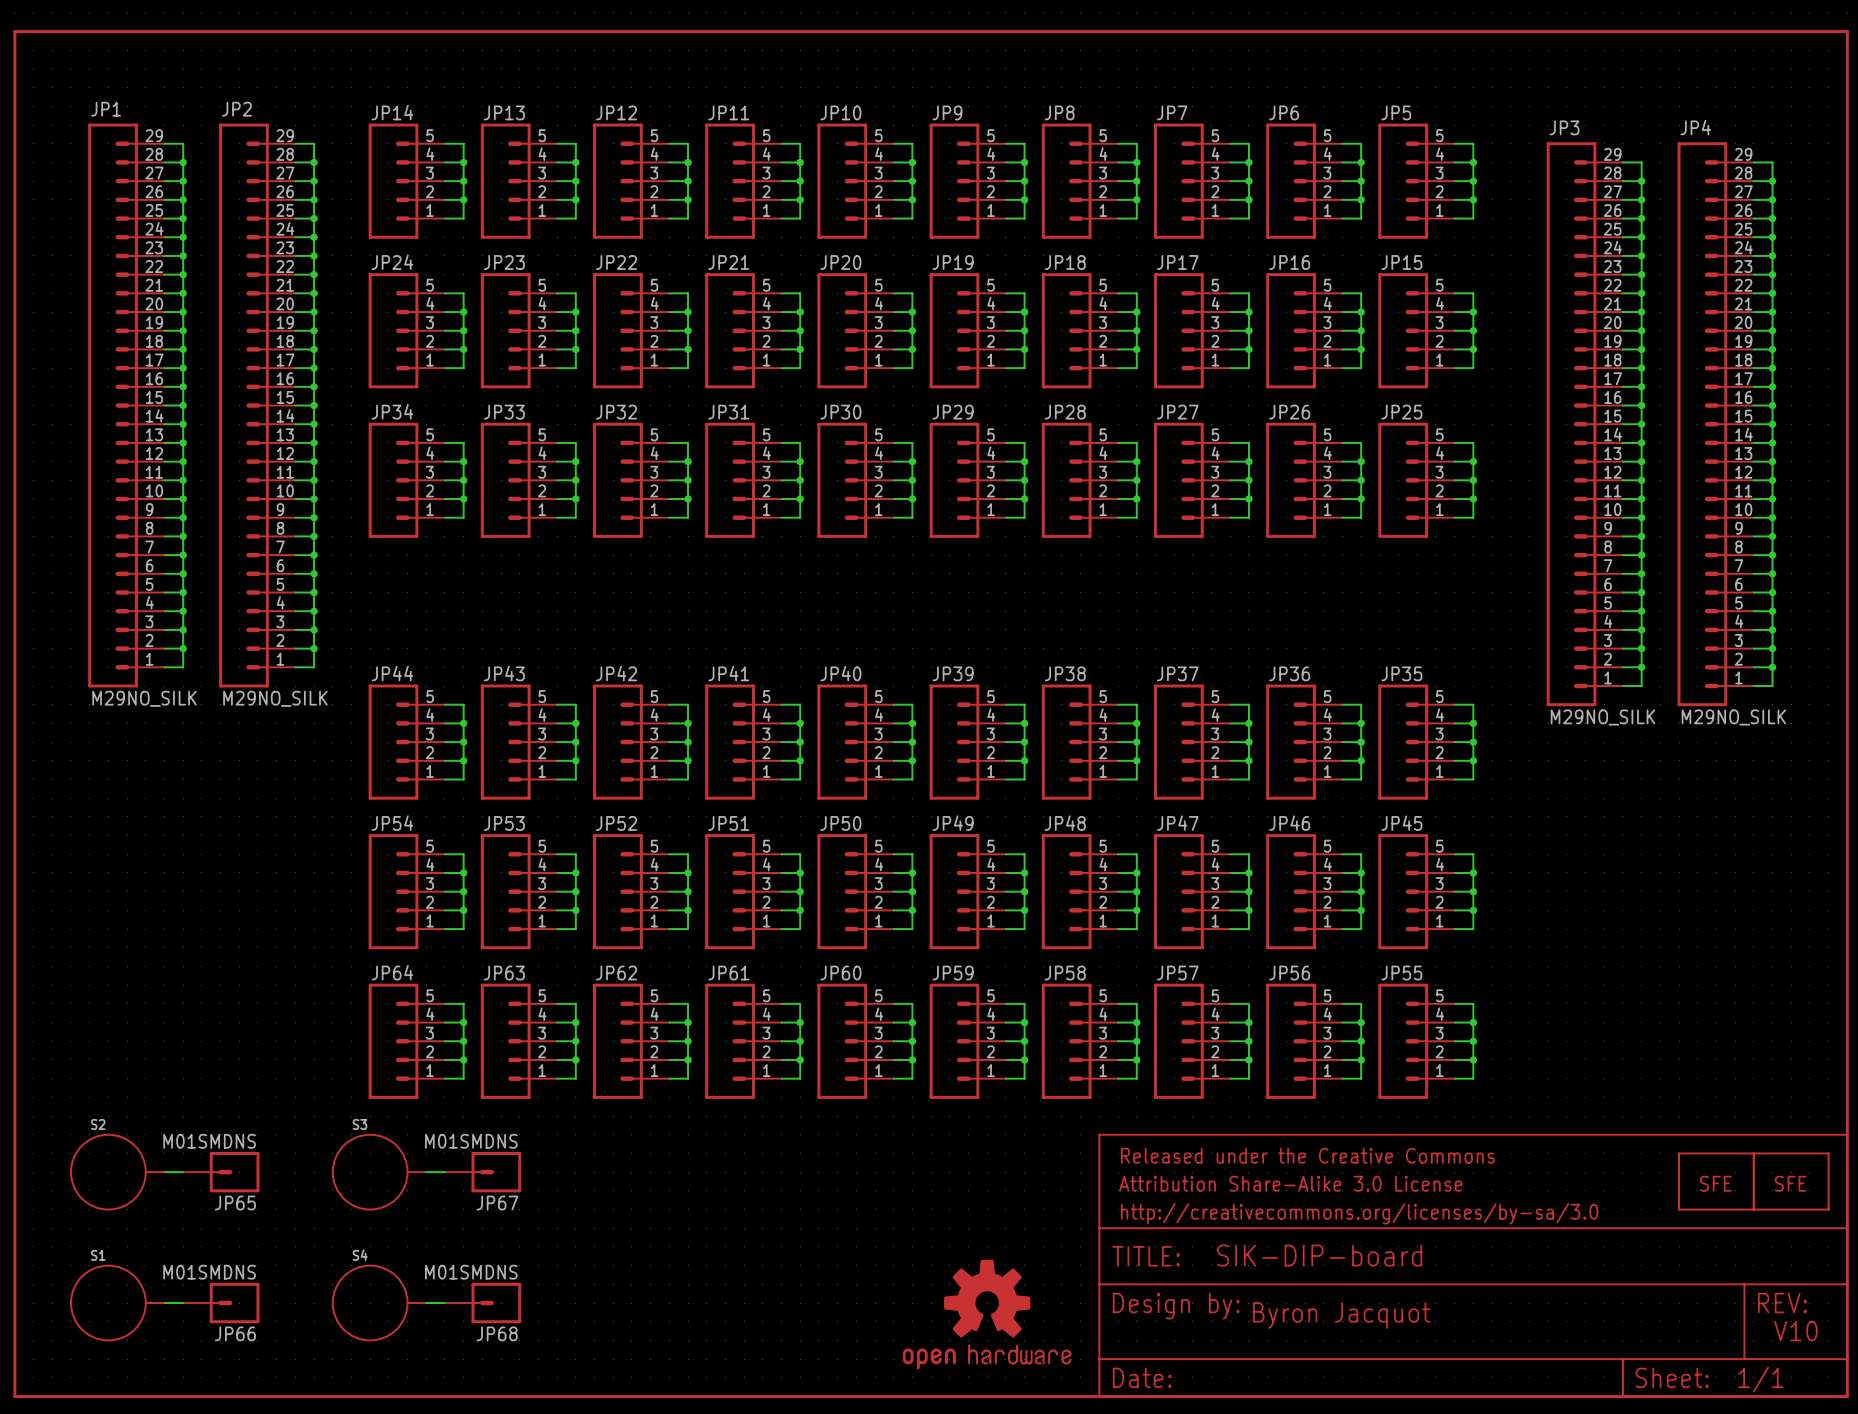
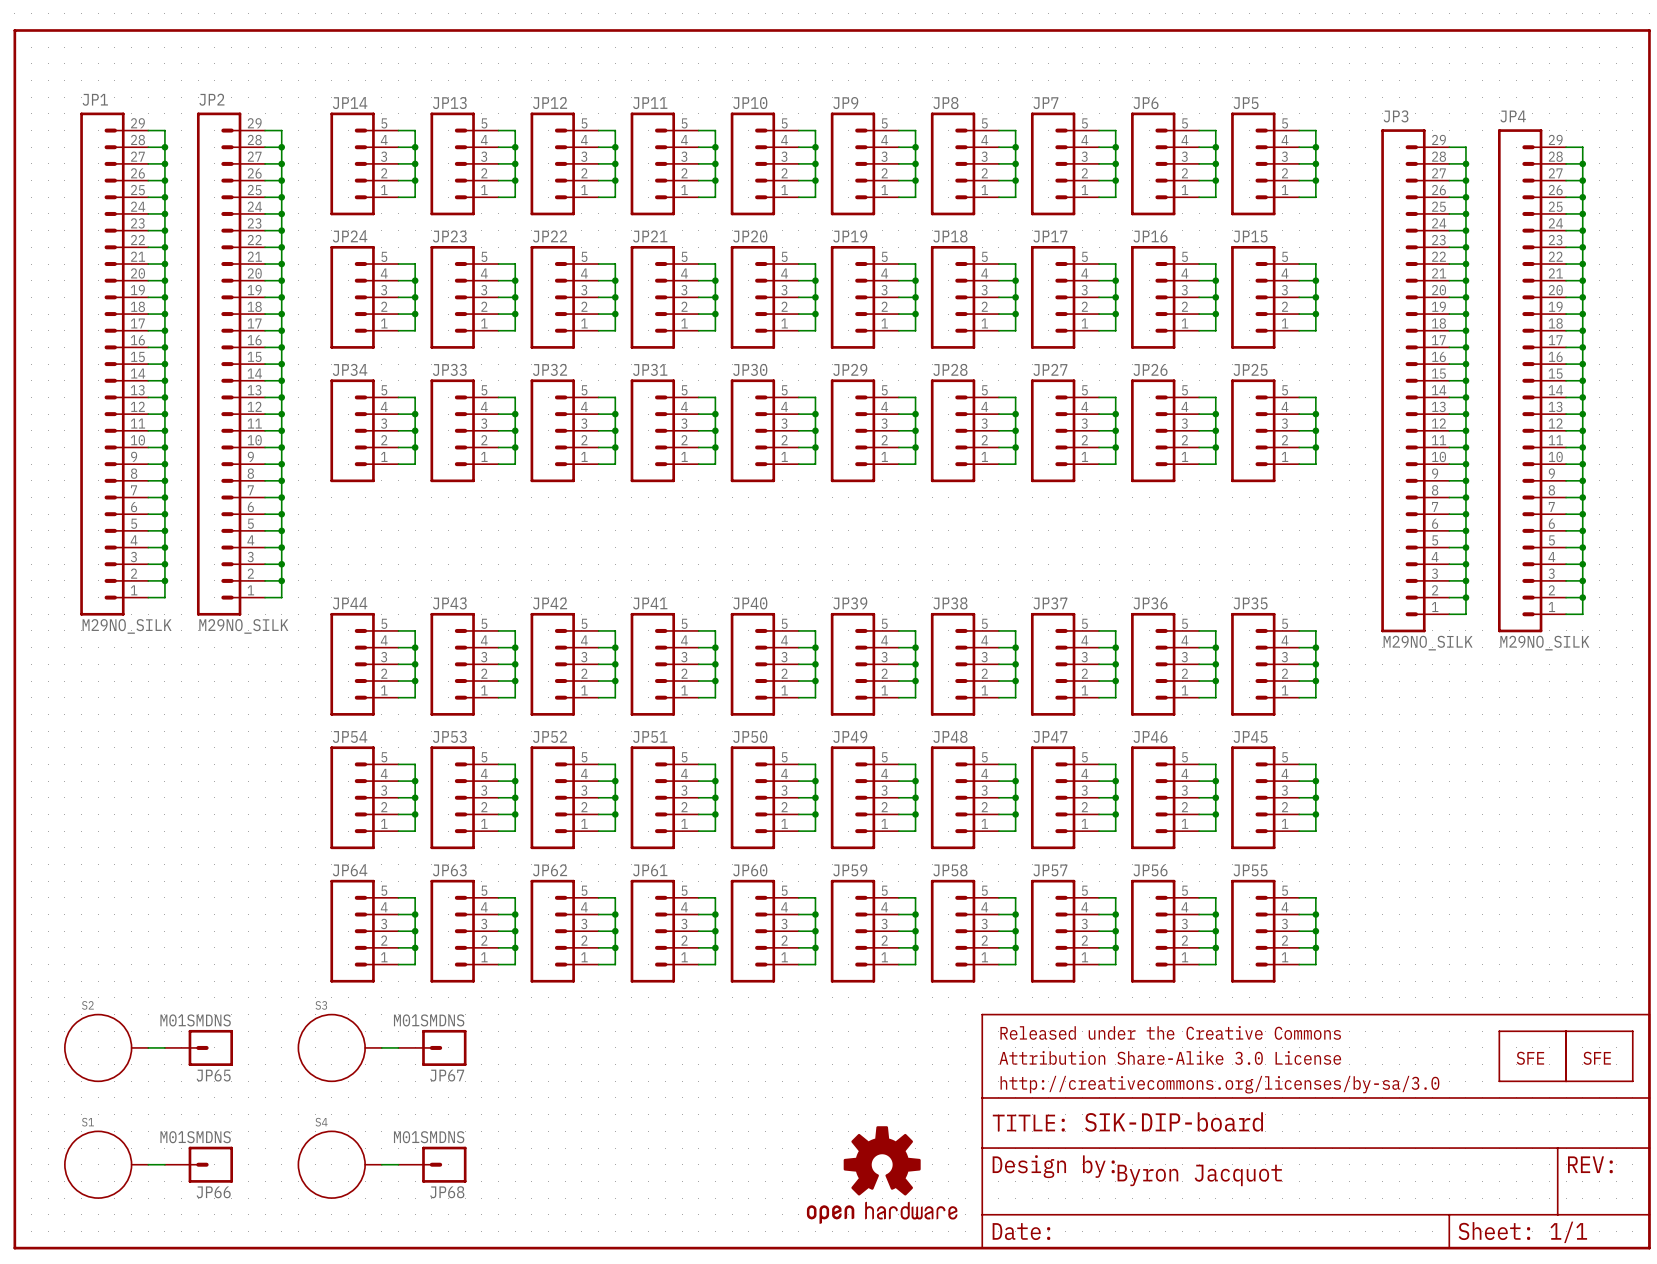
text: V10 (1795, 1331) -> none

